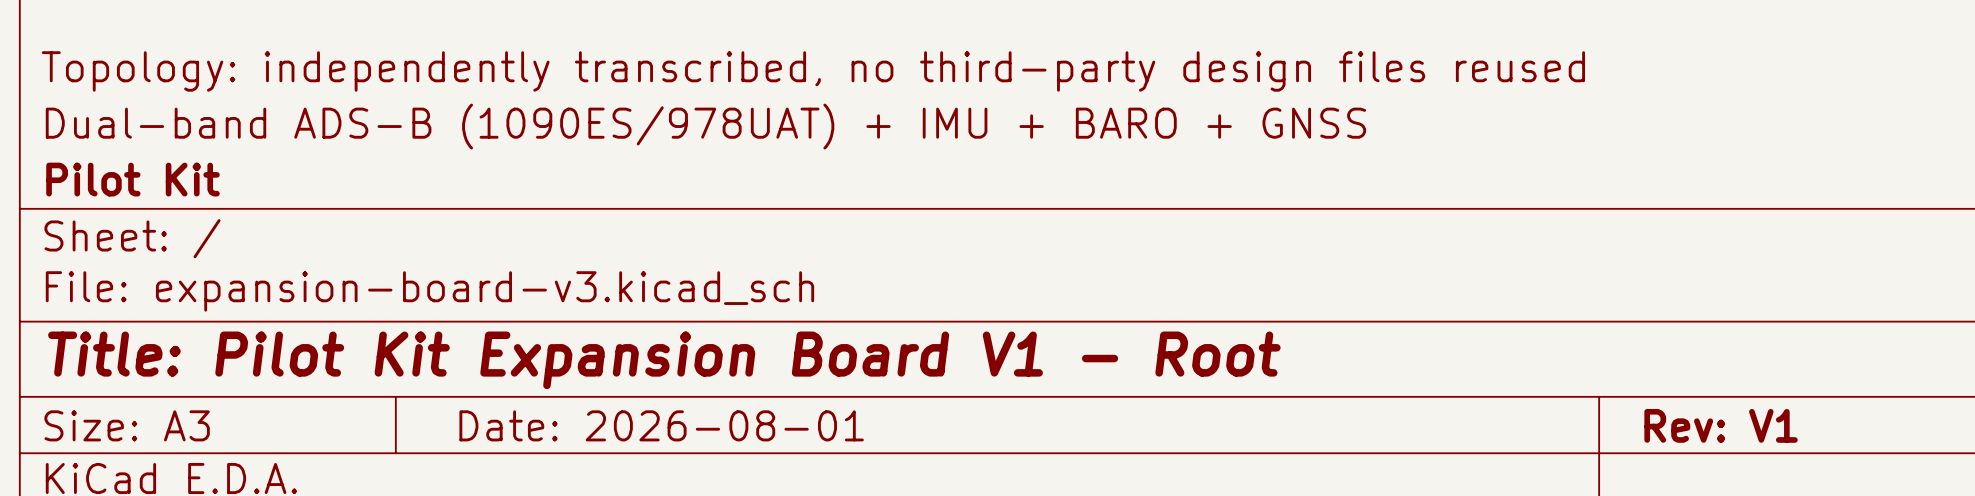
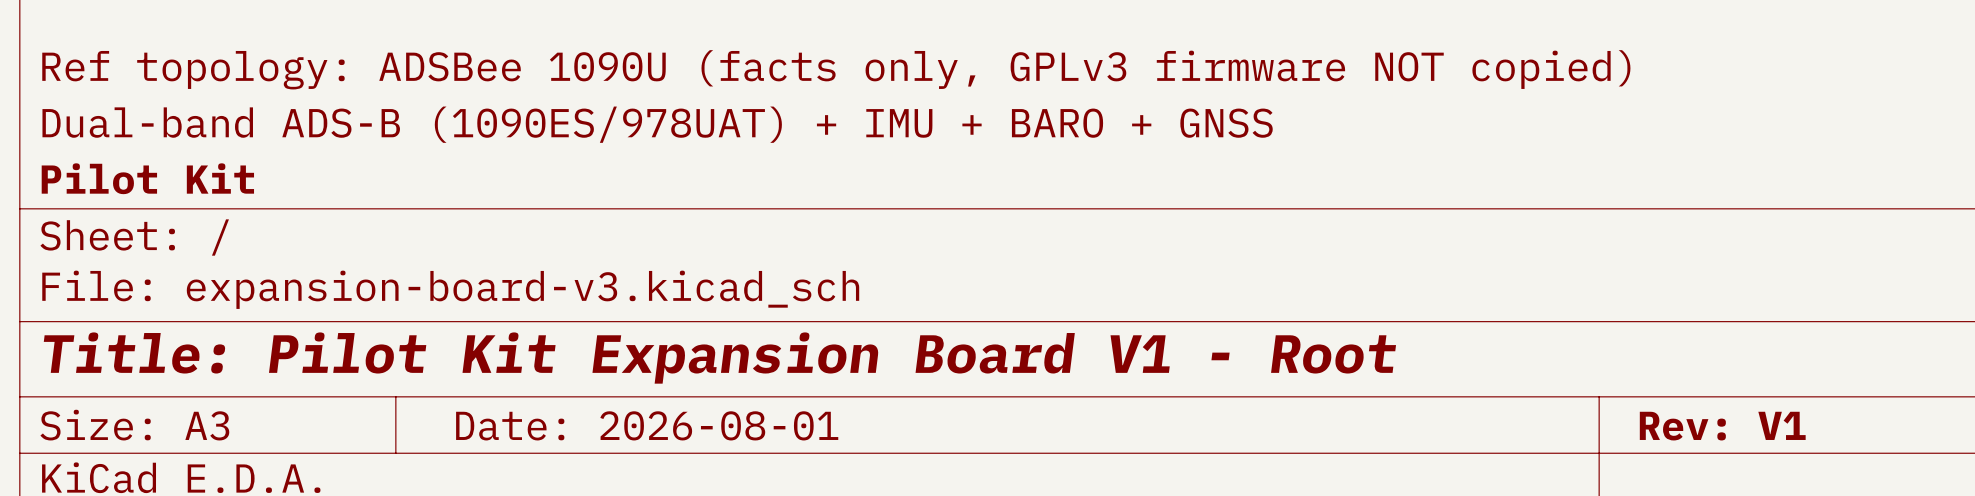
title block: Topology: independently transcribed, no third-party design files reused (813, 71) -> Ref topology: ADSBee 1090U (facts only, GPLv3 firmware NOT copied) (836, 69)

